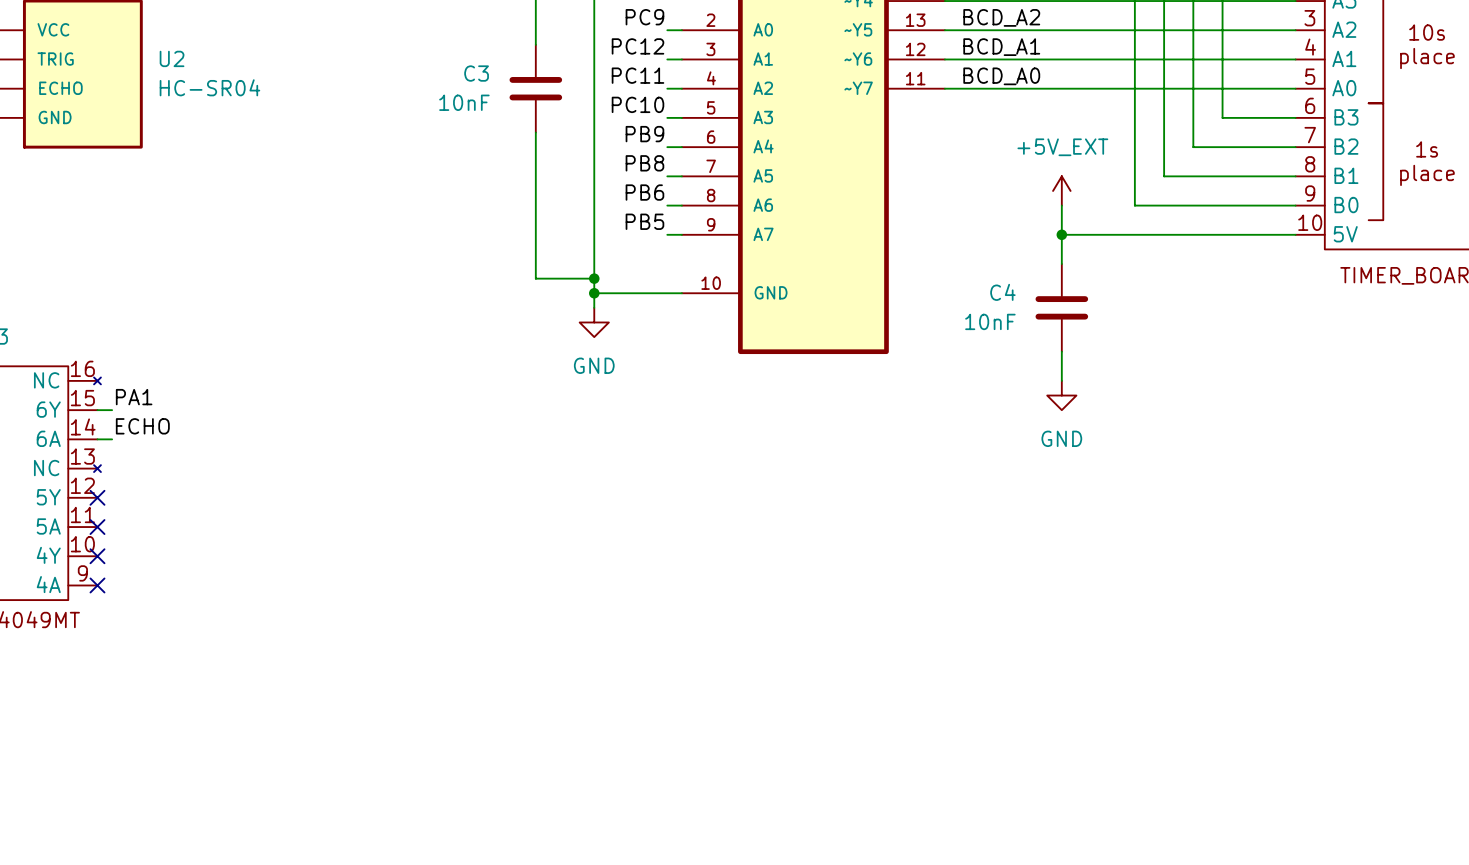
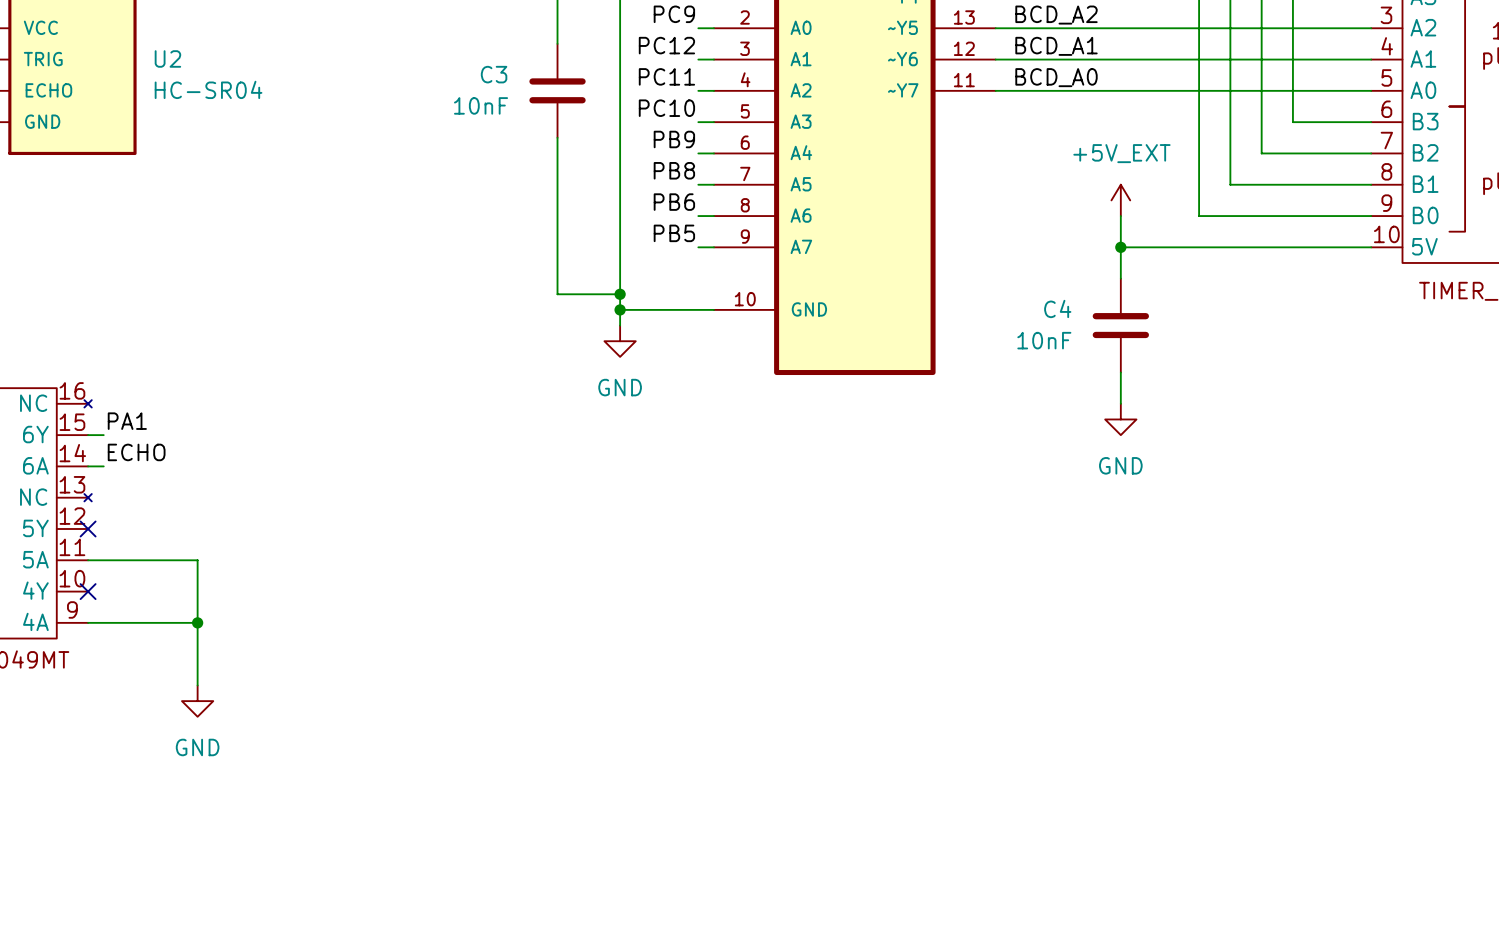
wire: none -> (88, 560) (197, 560) (197, 685)
no-connect mark: (97, 527) -> none
wire: none -> (88, 622) (197, 622)
no-connect mark: (97, 585) -> none
junction: none -> (197, 622)
power symbol: none -> GND (197, 701)

